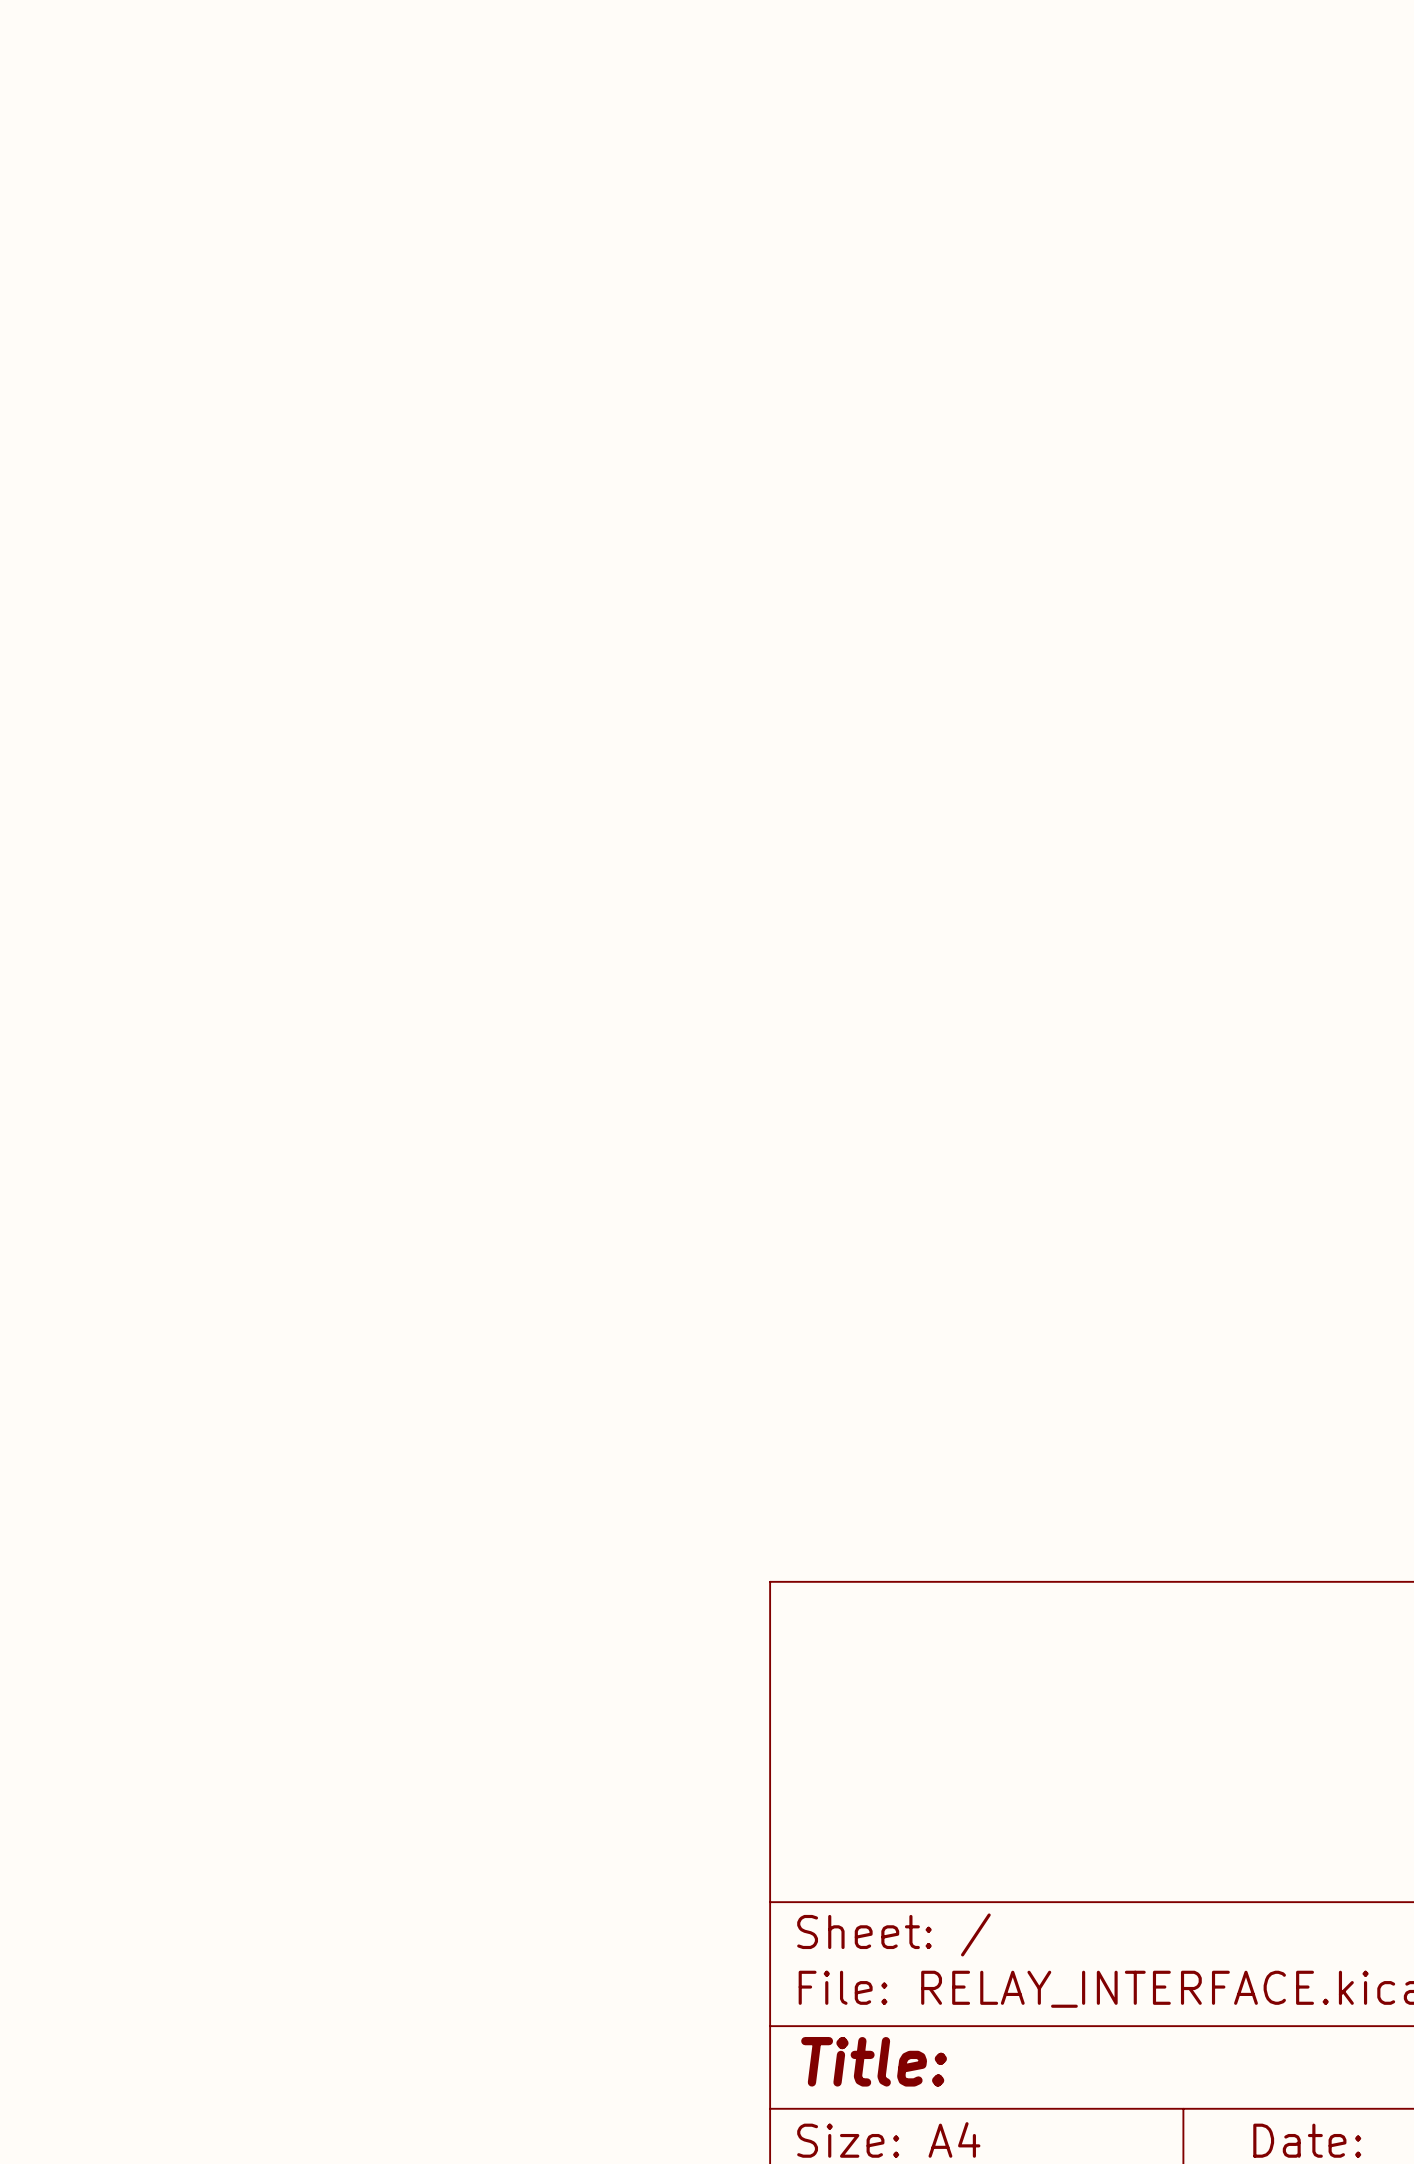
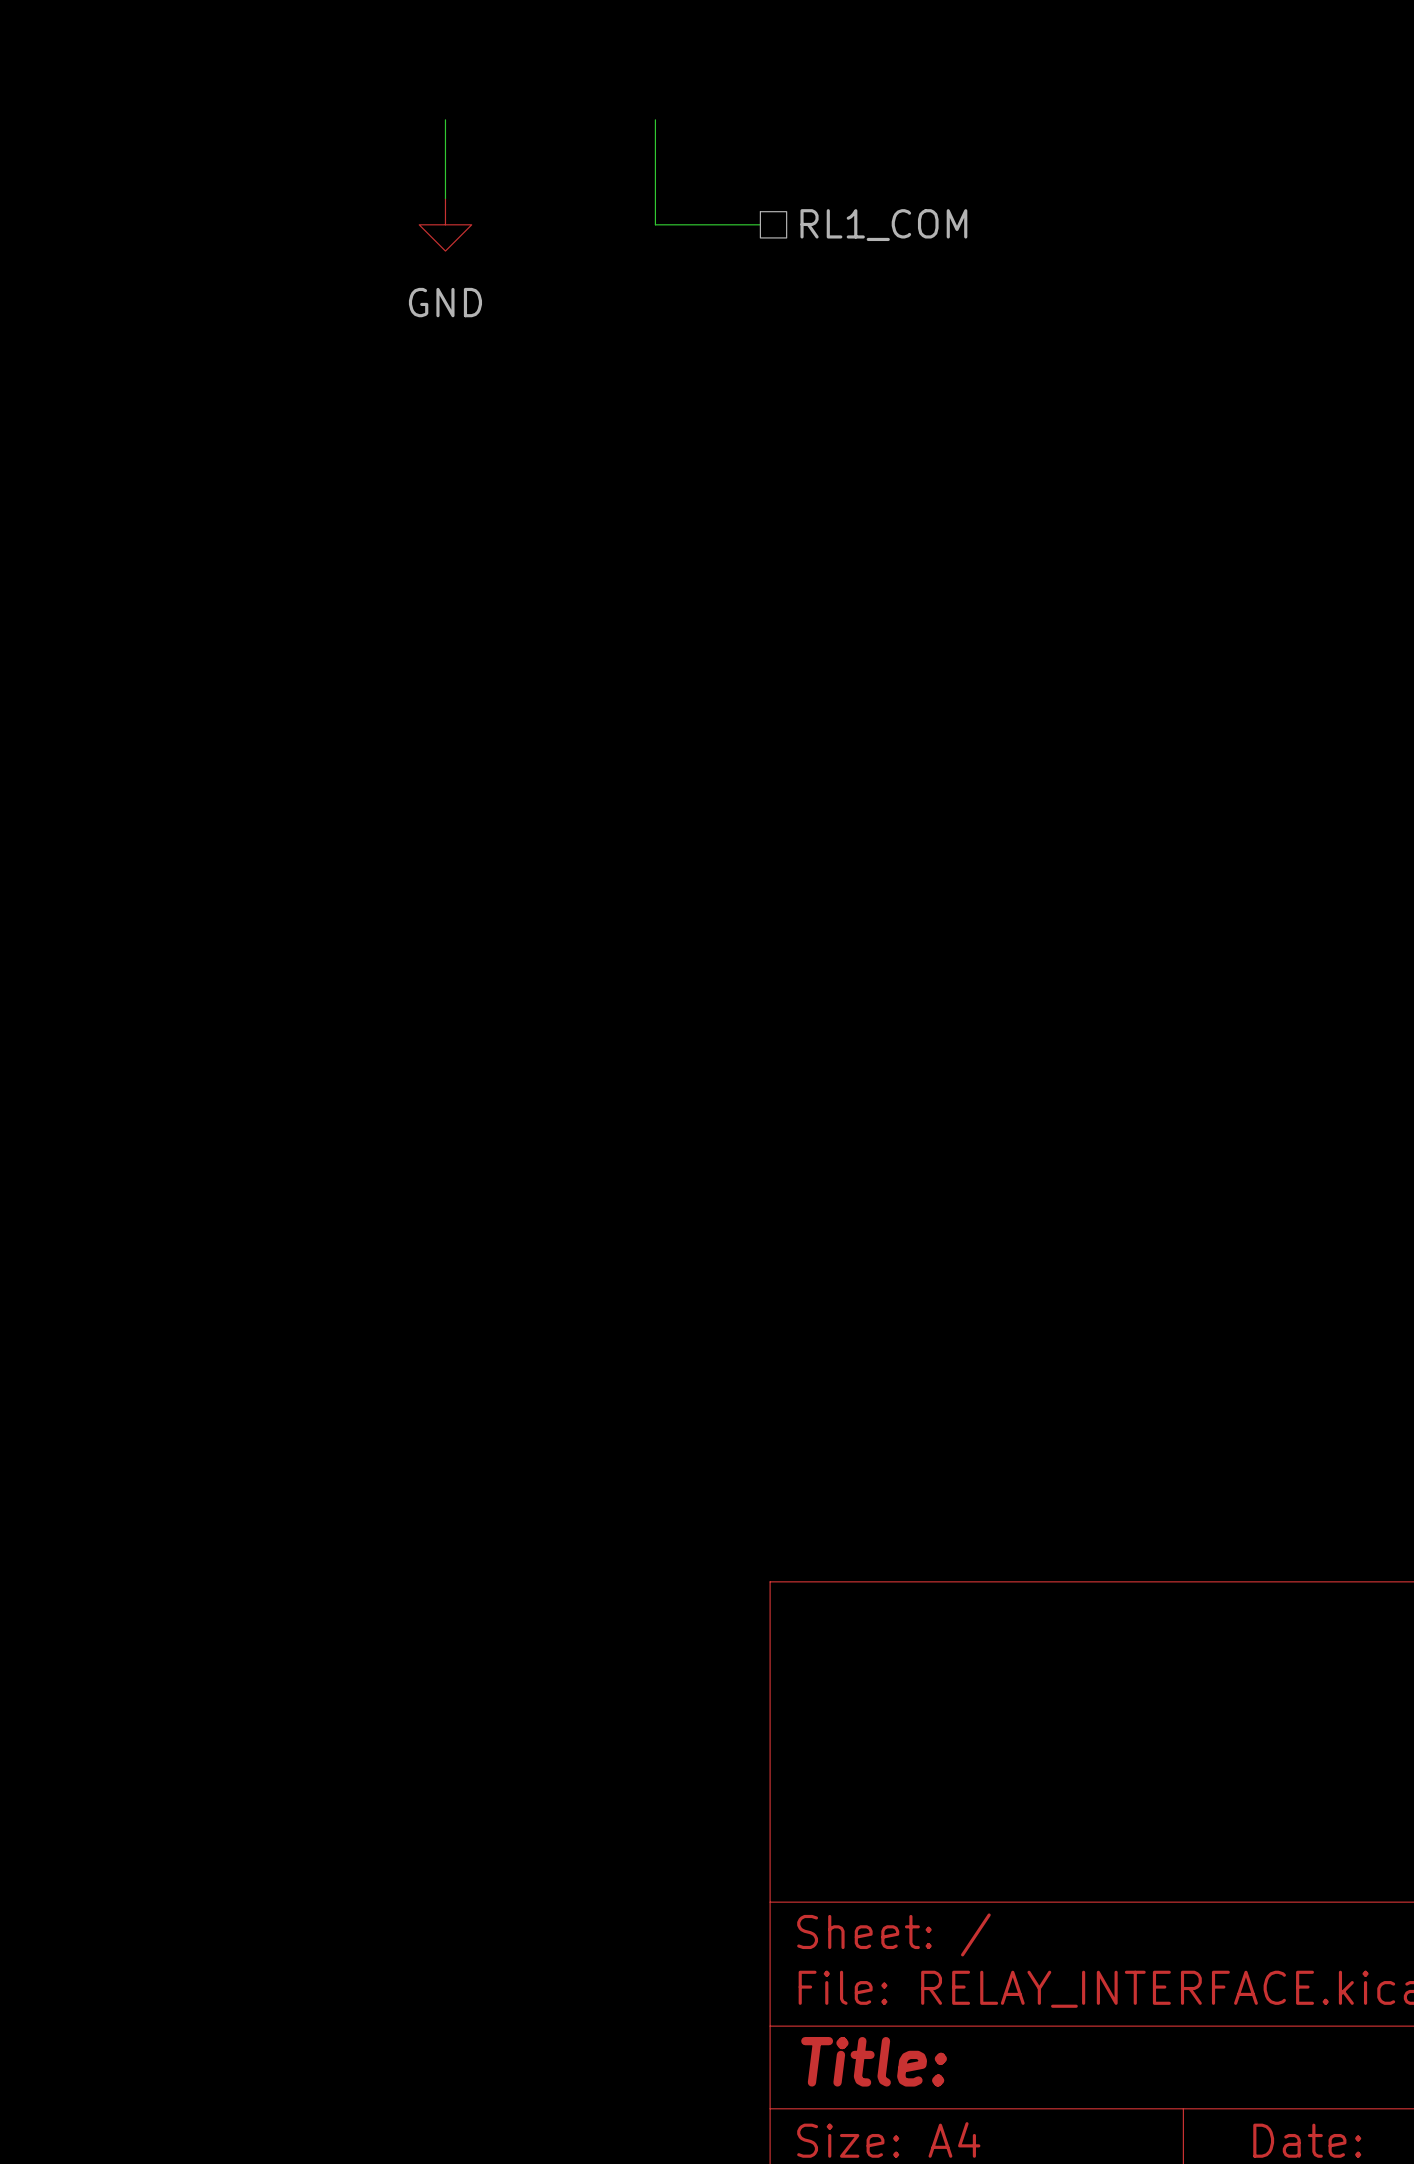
wire: none -> (445, 119) (445, 198)
wire: none -> (655, 119) (655, 224) (760, 224)
power symbol: none -> GND (445, 224)
hierarchical label: none -> RL1_COM (883, 225)

